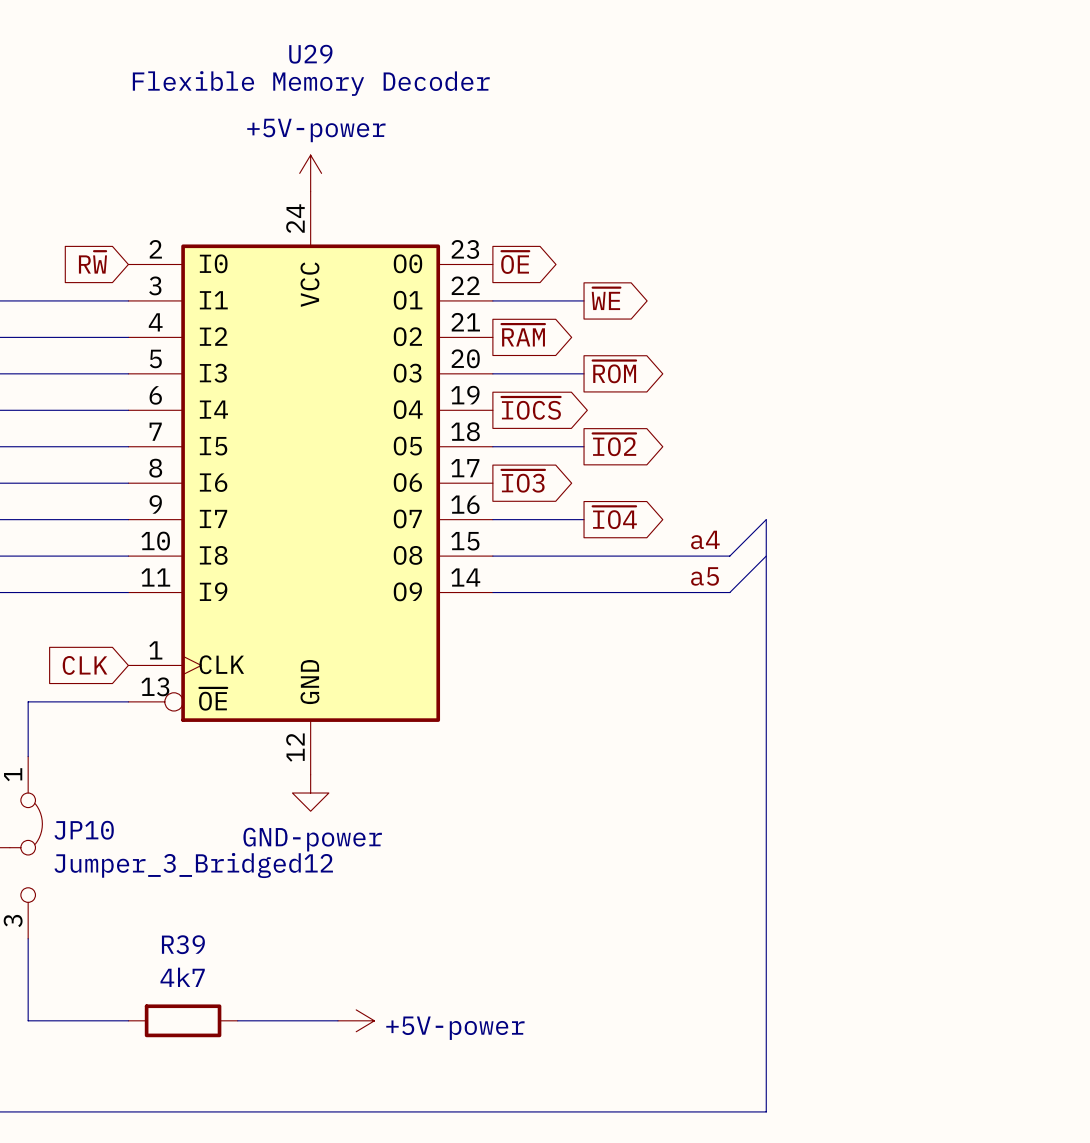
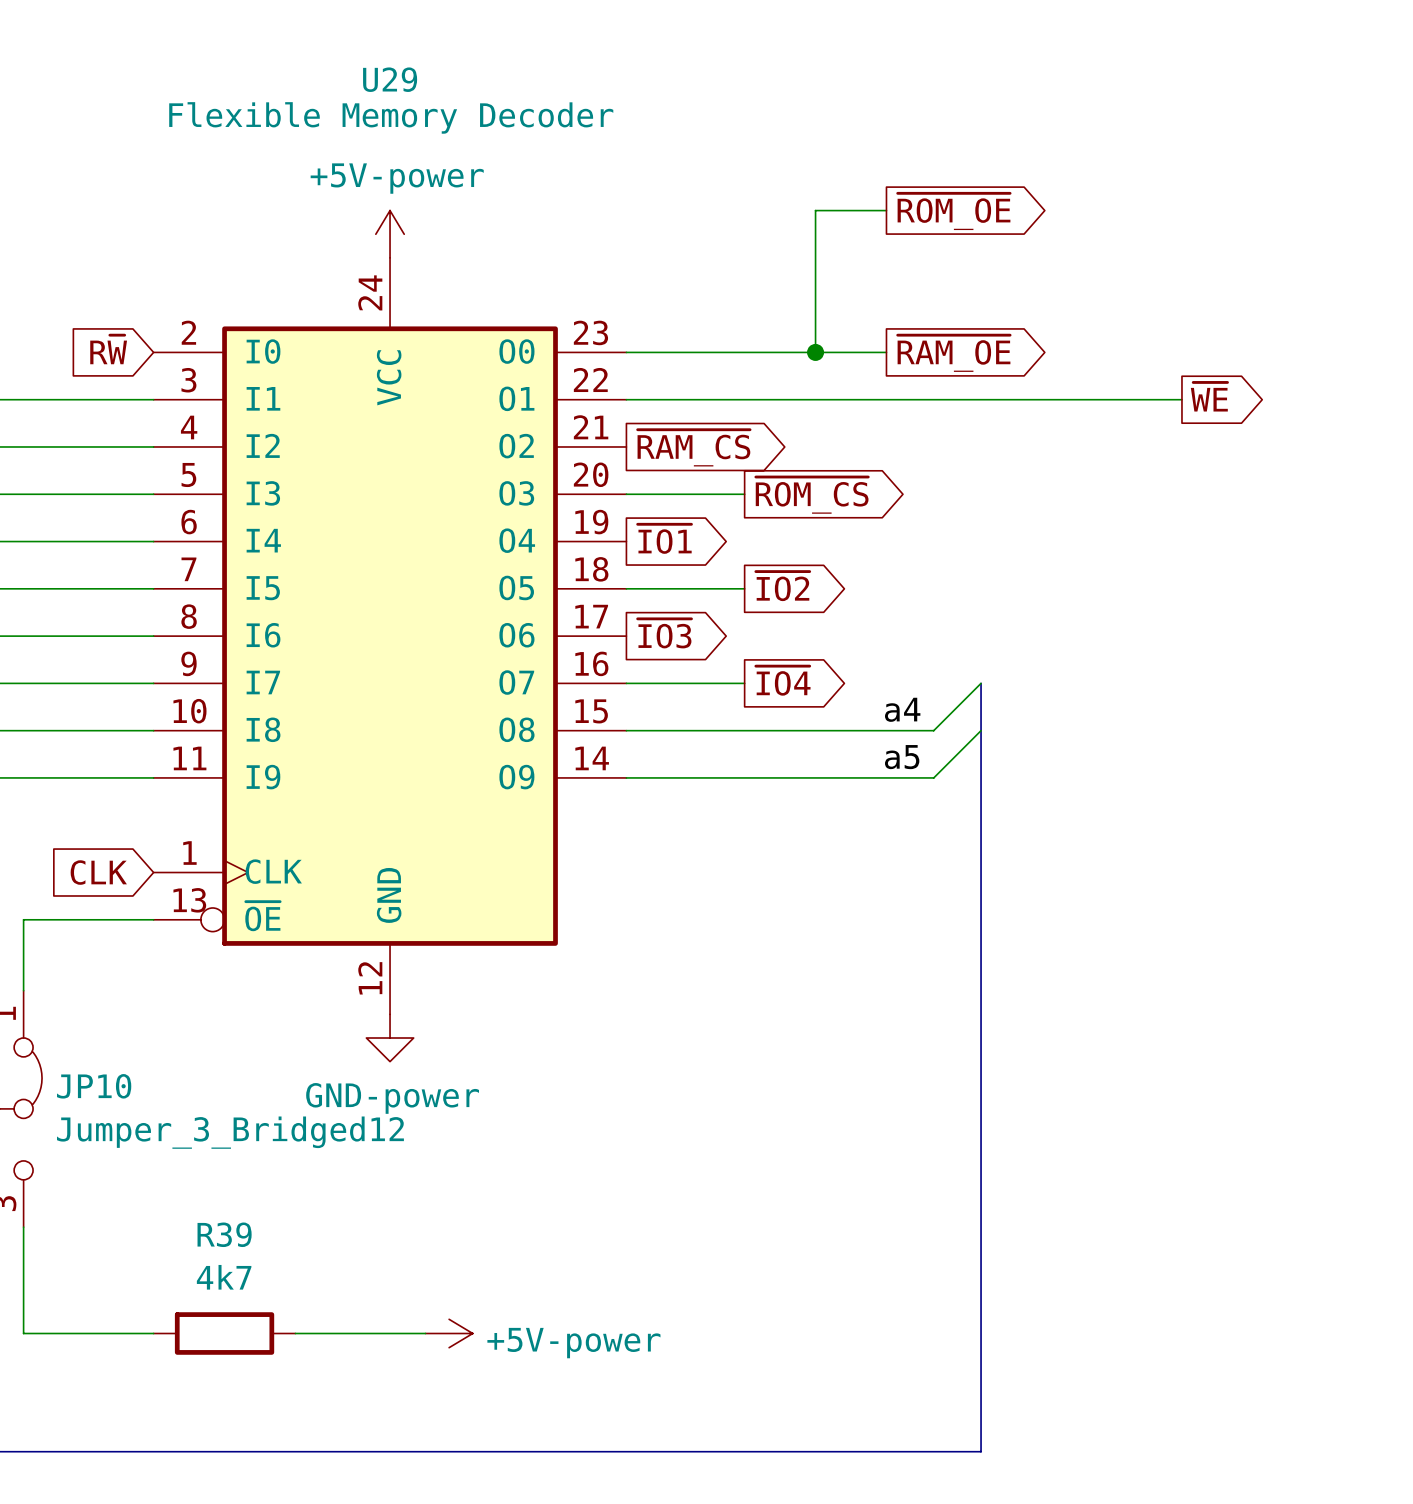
wire: none -> (886, 210) (815, 210) (815, 352)
global label: none -> ~{ROM_OE} (954, 211)
global label: ~{OE} (515, 262) -> none
wire: none -> (626, 352) (886, 352)
junction: none -> (815, 352)
global label: none -> ~{RAM_OE} (954, 353)
global label position: ~{WE} (606, 298) -> ~{WE} (1209, 396)
wire: none -> (744, 399) (1181, 399)
global label: ~{RAM} (523, 335) -> ~{RAM_CS} (693, 448)
global label: ~{ROM} (614, 371) -> ~{ROM_CS} (812, 495)
global label: ~{IOCS} (531, 408) -> ~{IO1} (664, 539)

